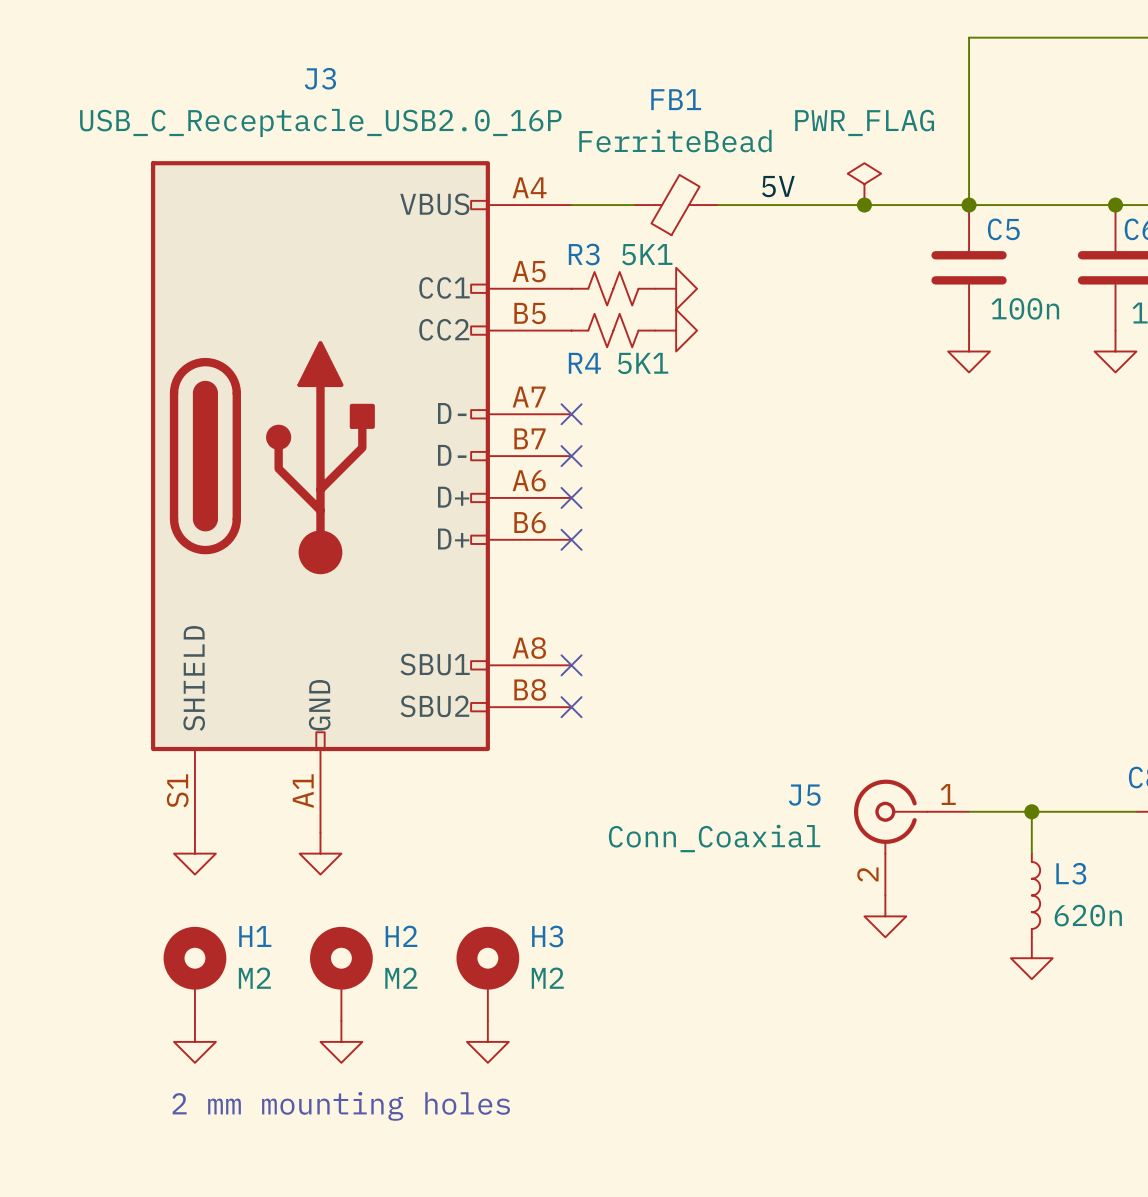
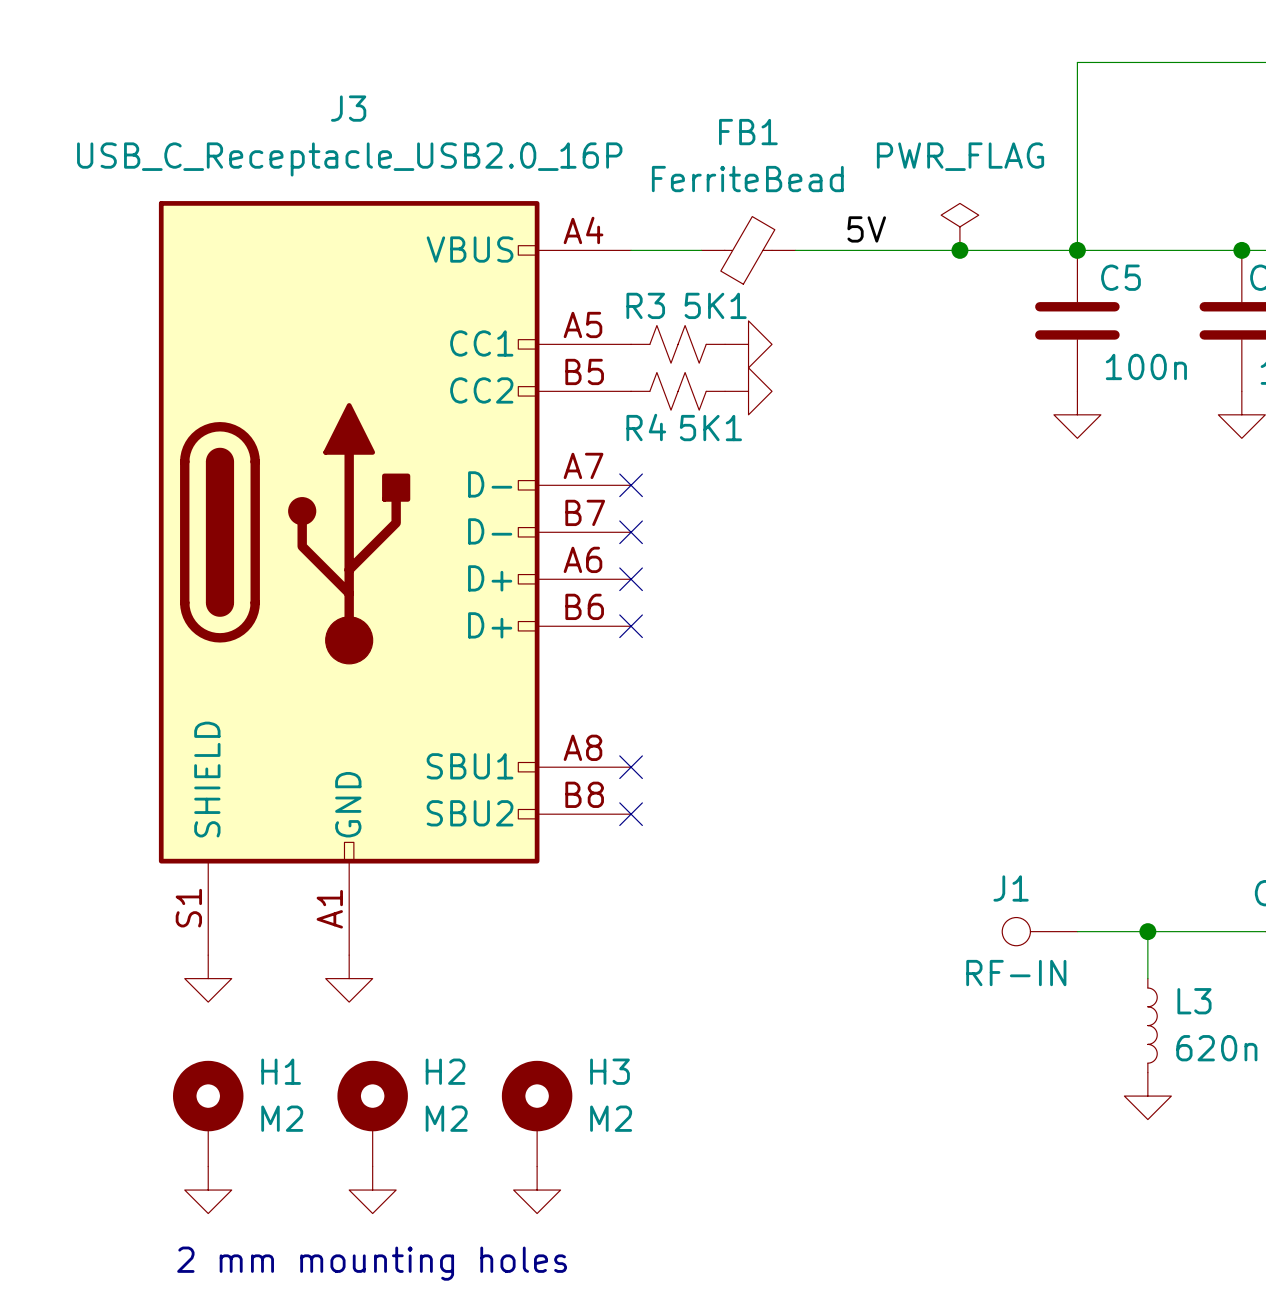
J1: none -> RF-IN (1039, 931)
J5: Conn_Coaxial (911, 837) -> none
power symbol: (885, 916) -> none

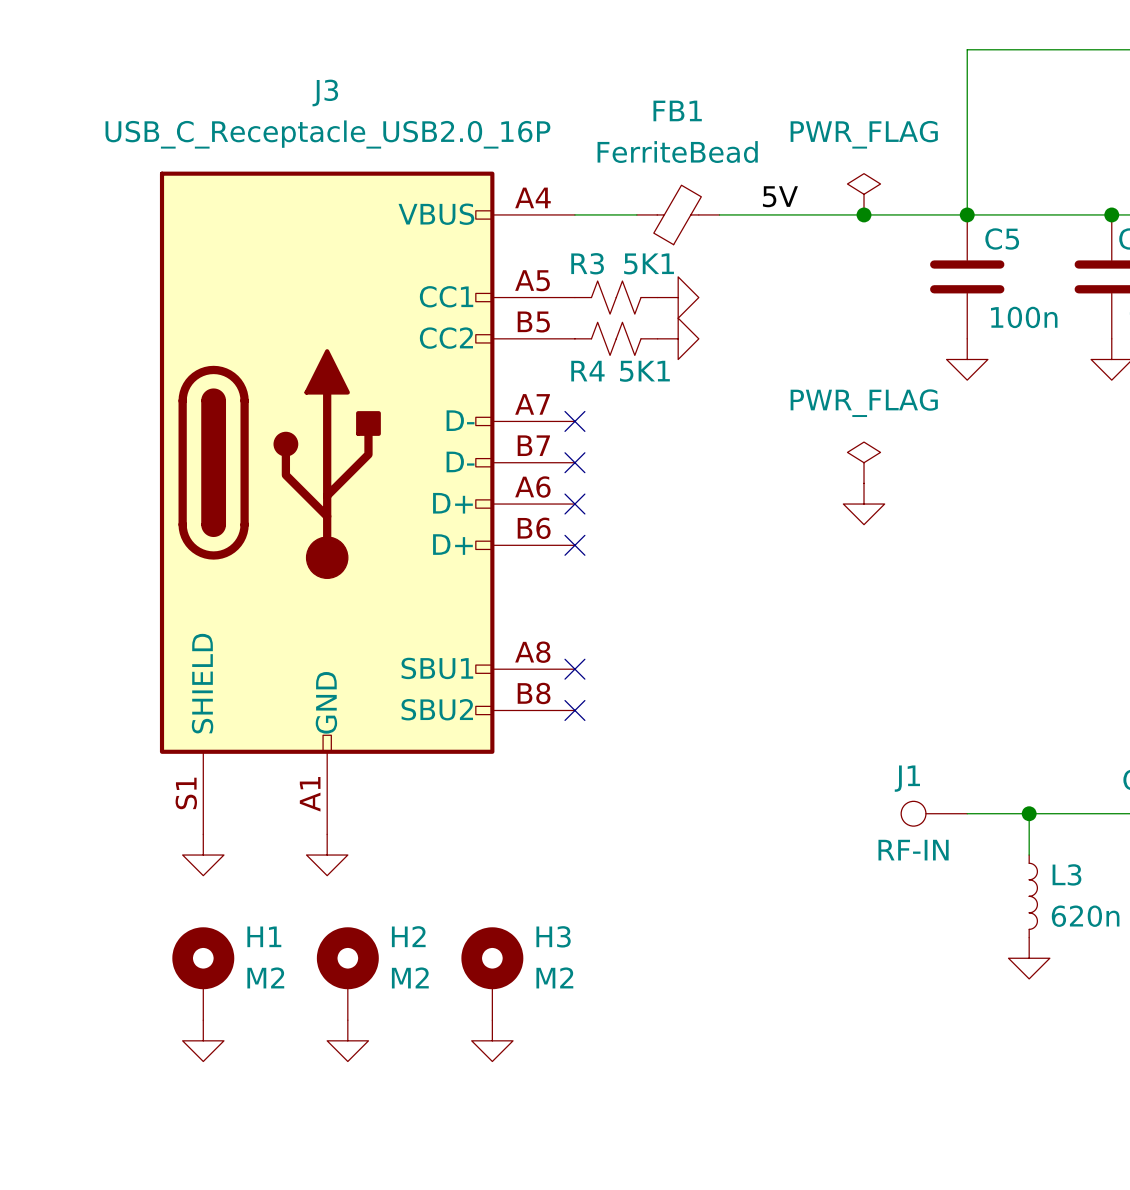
power symbol: none -> PWR_FLAG (864, 462)
power symbol: none -> (864, 504)
text: 2 mm mounting holes (372, 1263) -> none

